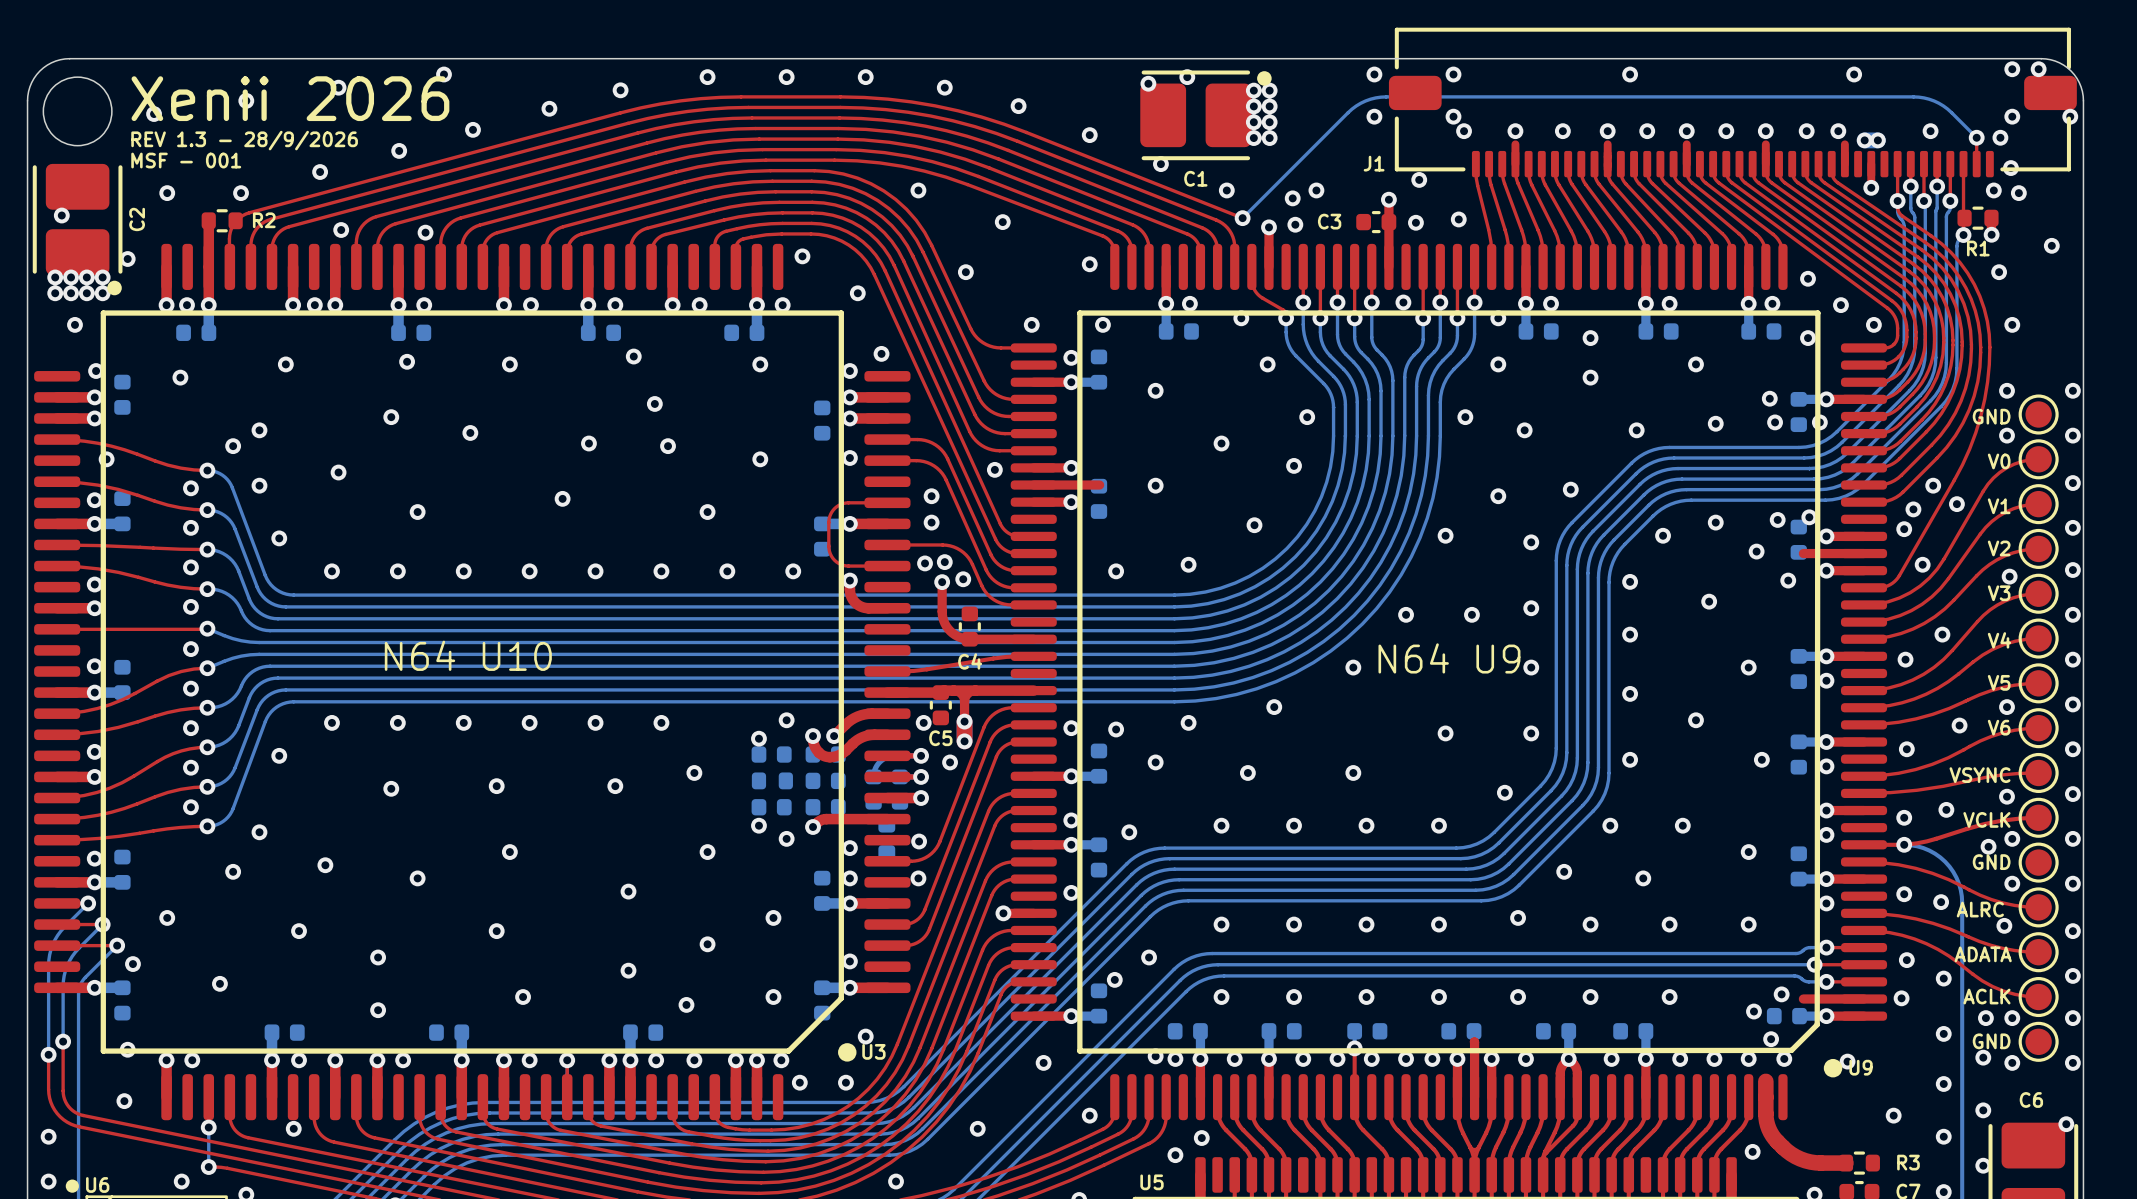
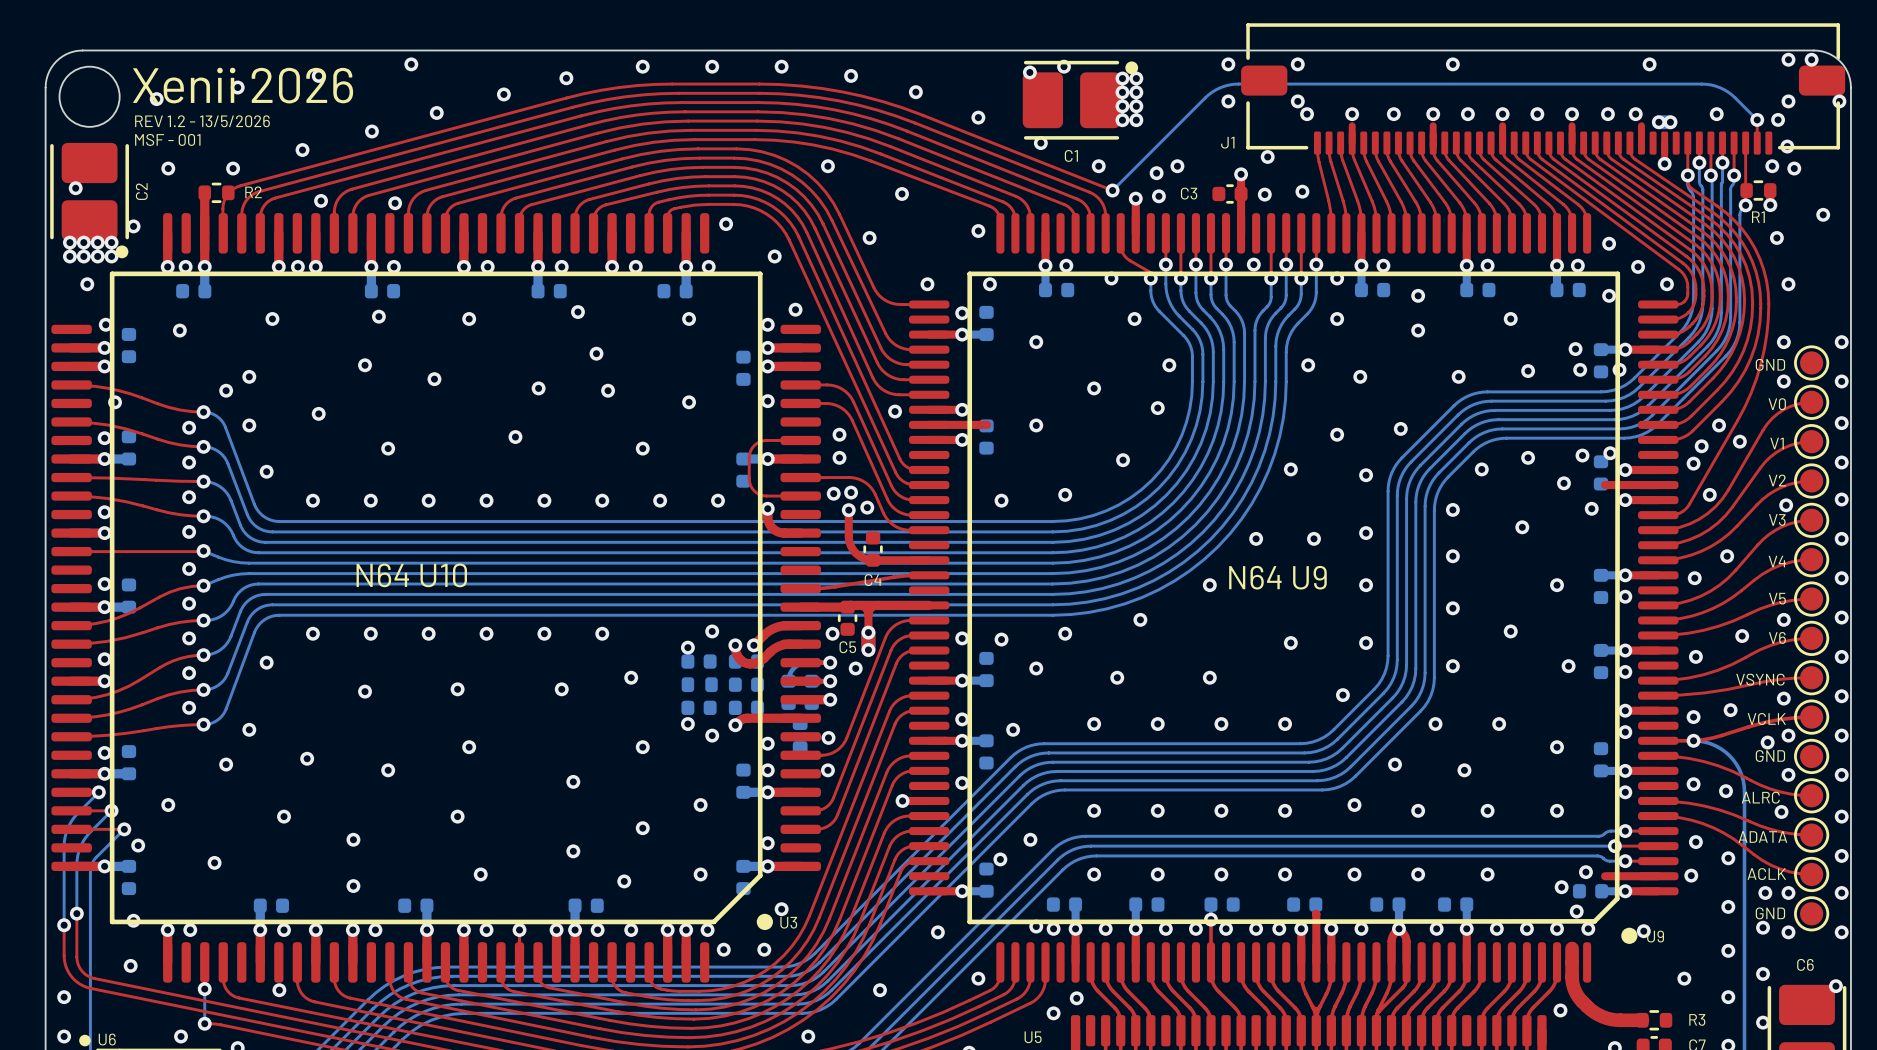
text: REV 1.3 - 28/9/2026 (244, 140) -> REV 1.2 - 13/5/2026 (202, 121)
part footprint: [34, 243, 911, 1121] -> [51, 213, 821, 983]
part footprint: [1010, 243, 1888, 1121] -> [908, 213, 1679, 983]
drawing: [838, 1043, 857, 1062] -> none
drawing: [1823, 1058, 1843, 1078] -> none

